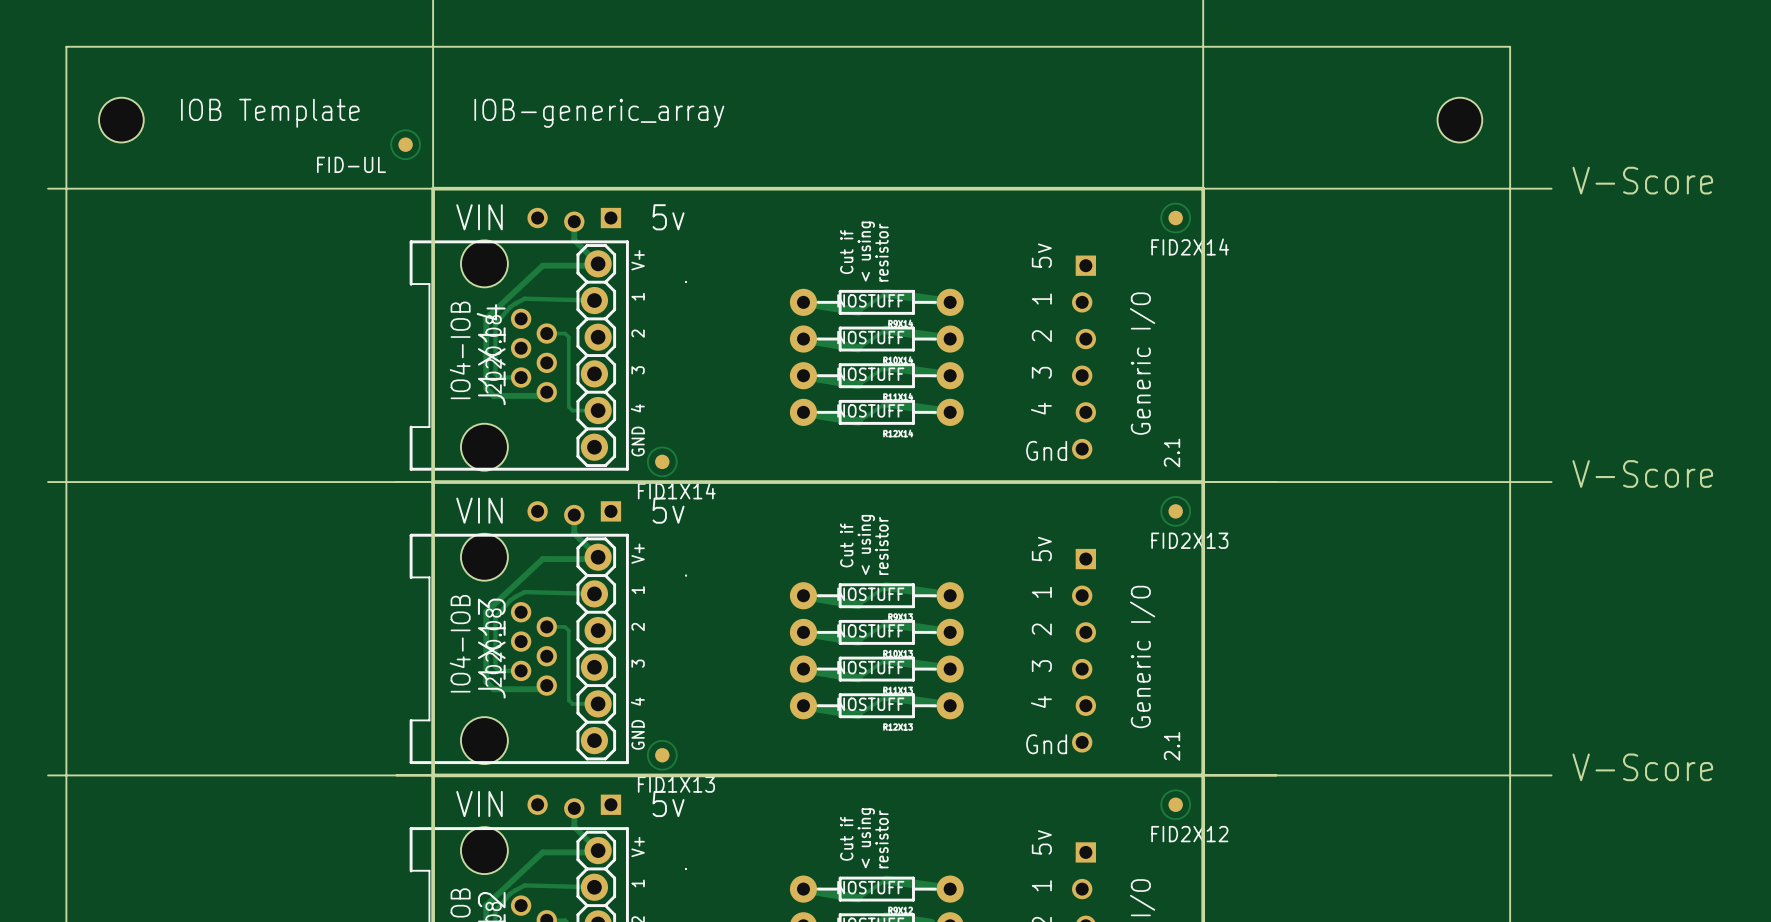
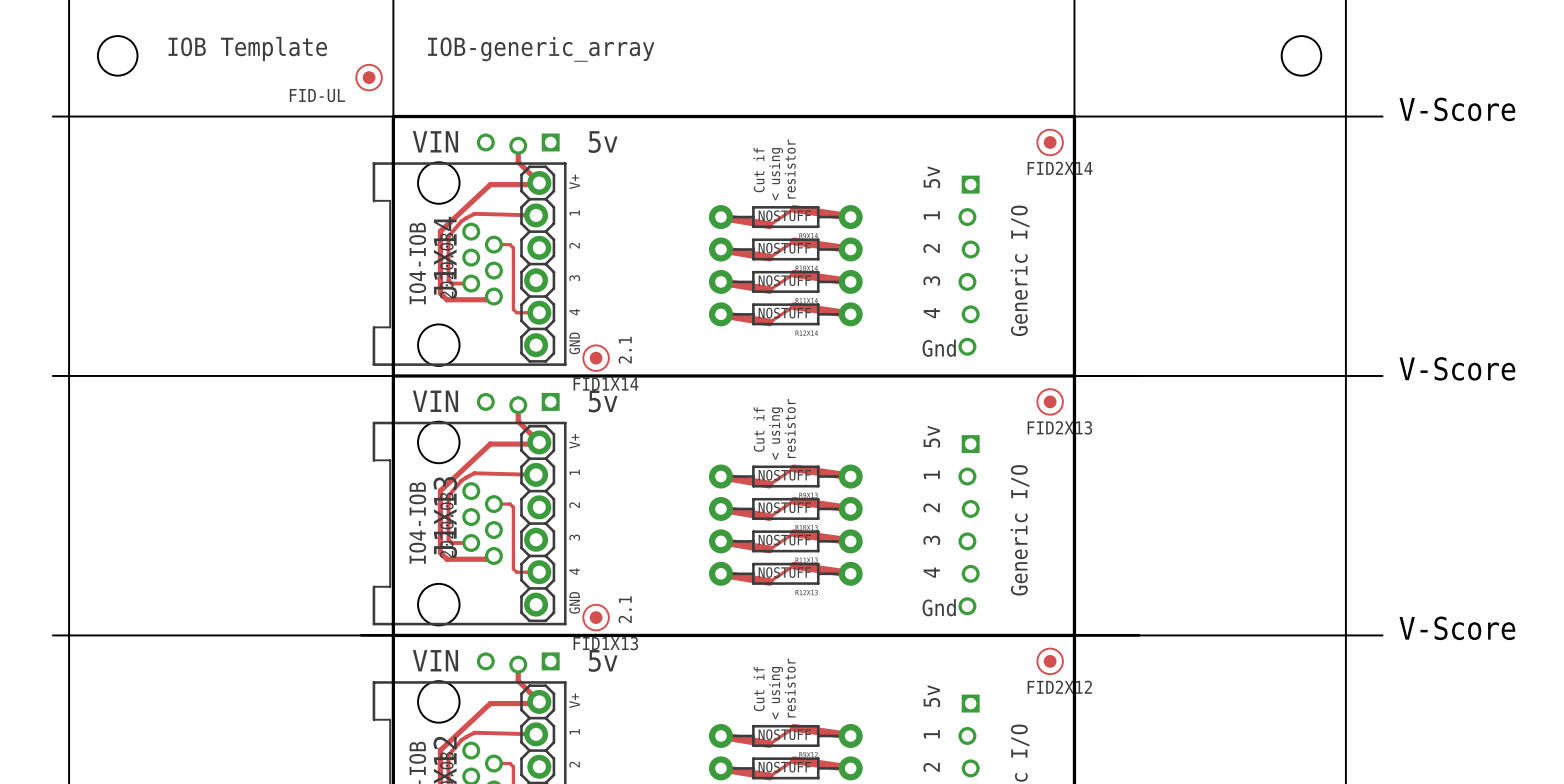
text: none -> 2.1 (625, 350)
text: 2.1 (1172, 453) -> none
text: none -> 2.1 (625, 609)
text: 2.1 (1172, 746) -> none

